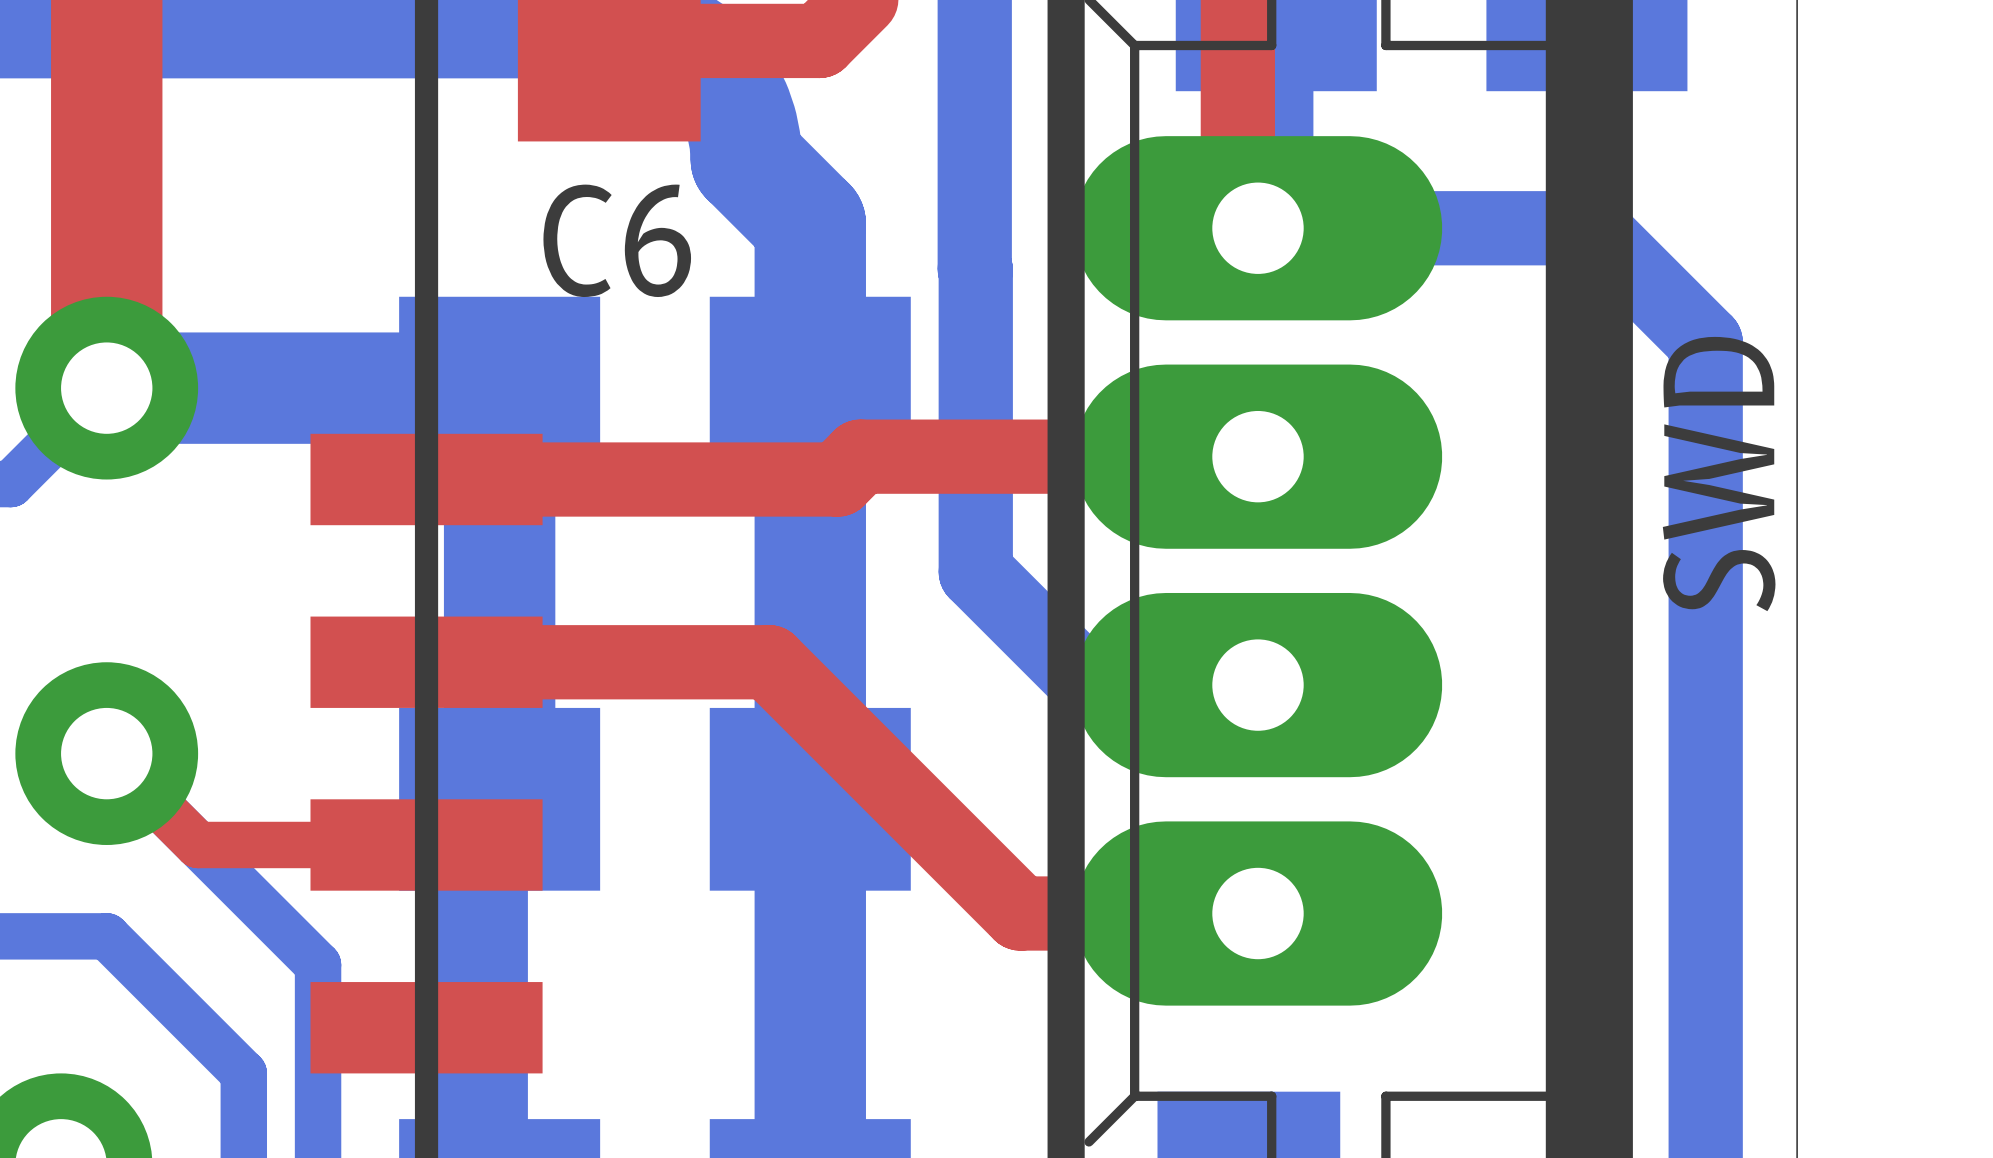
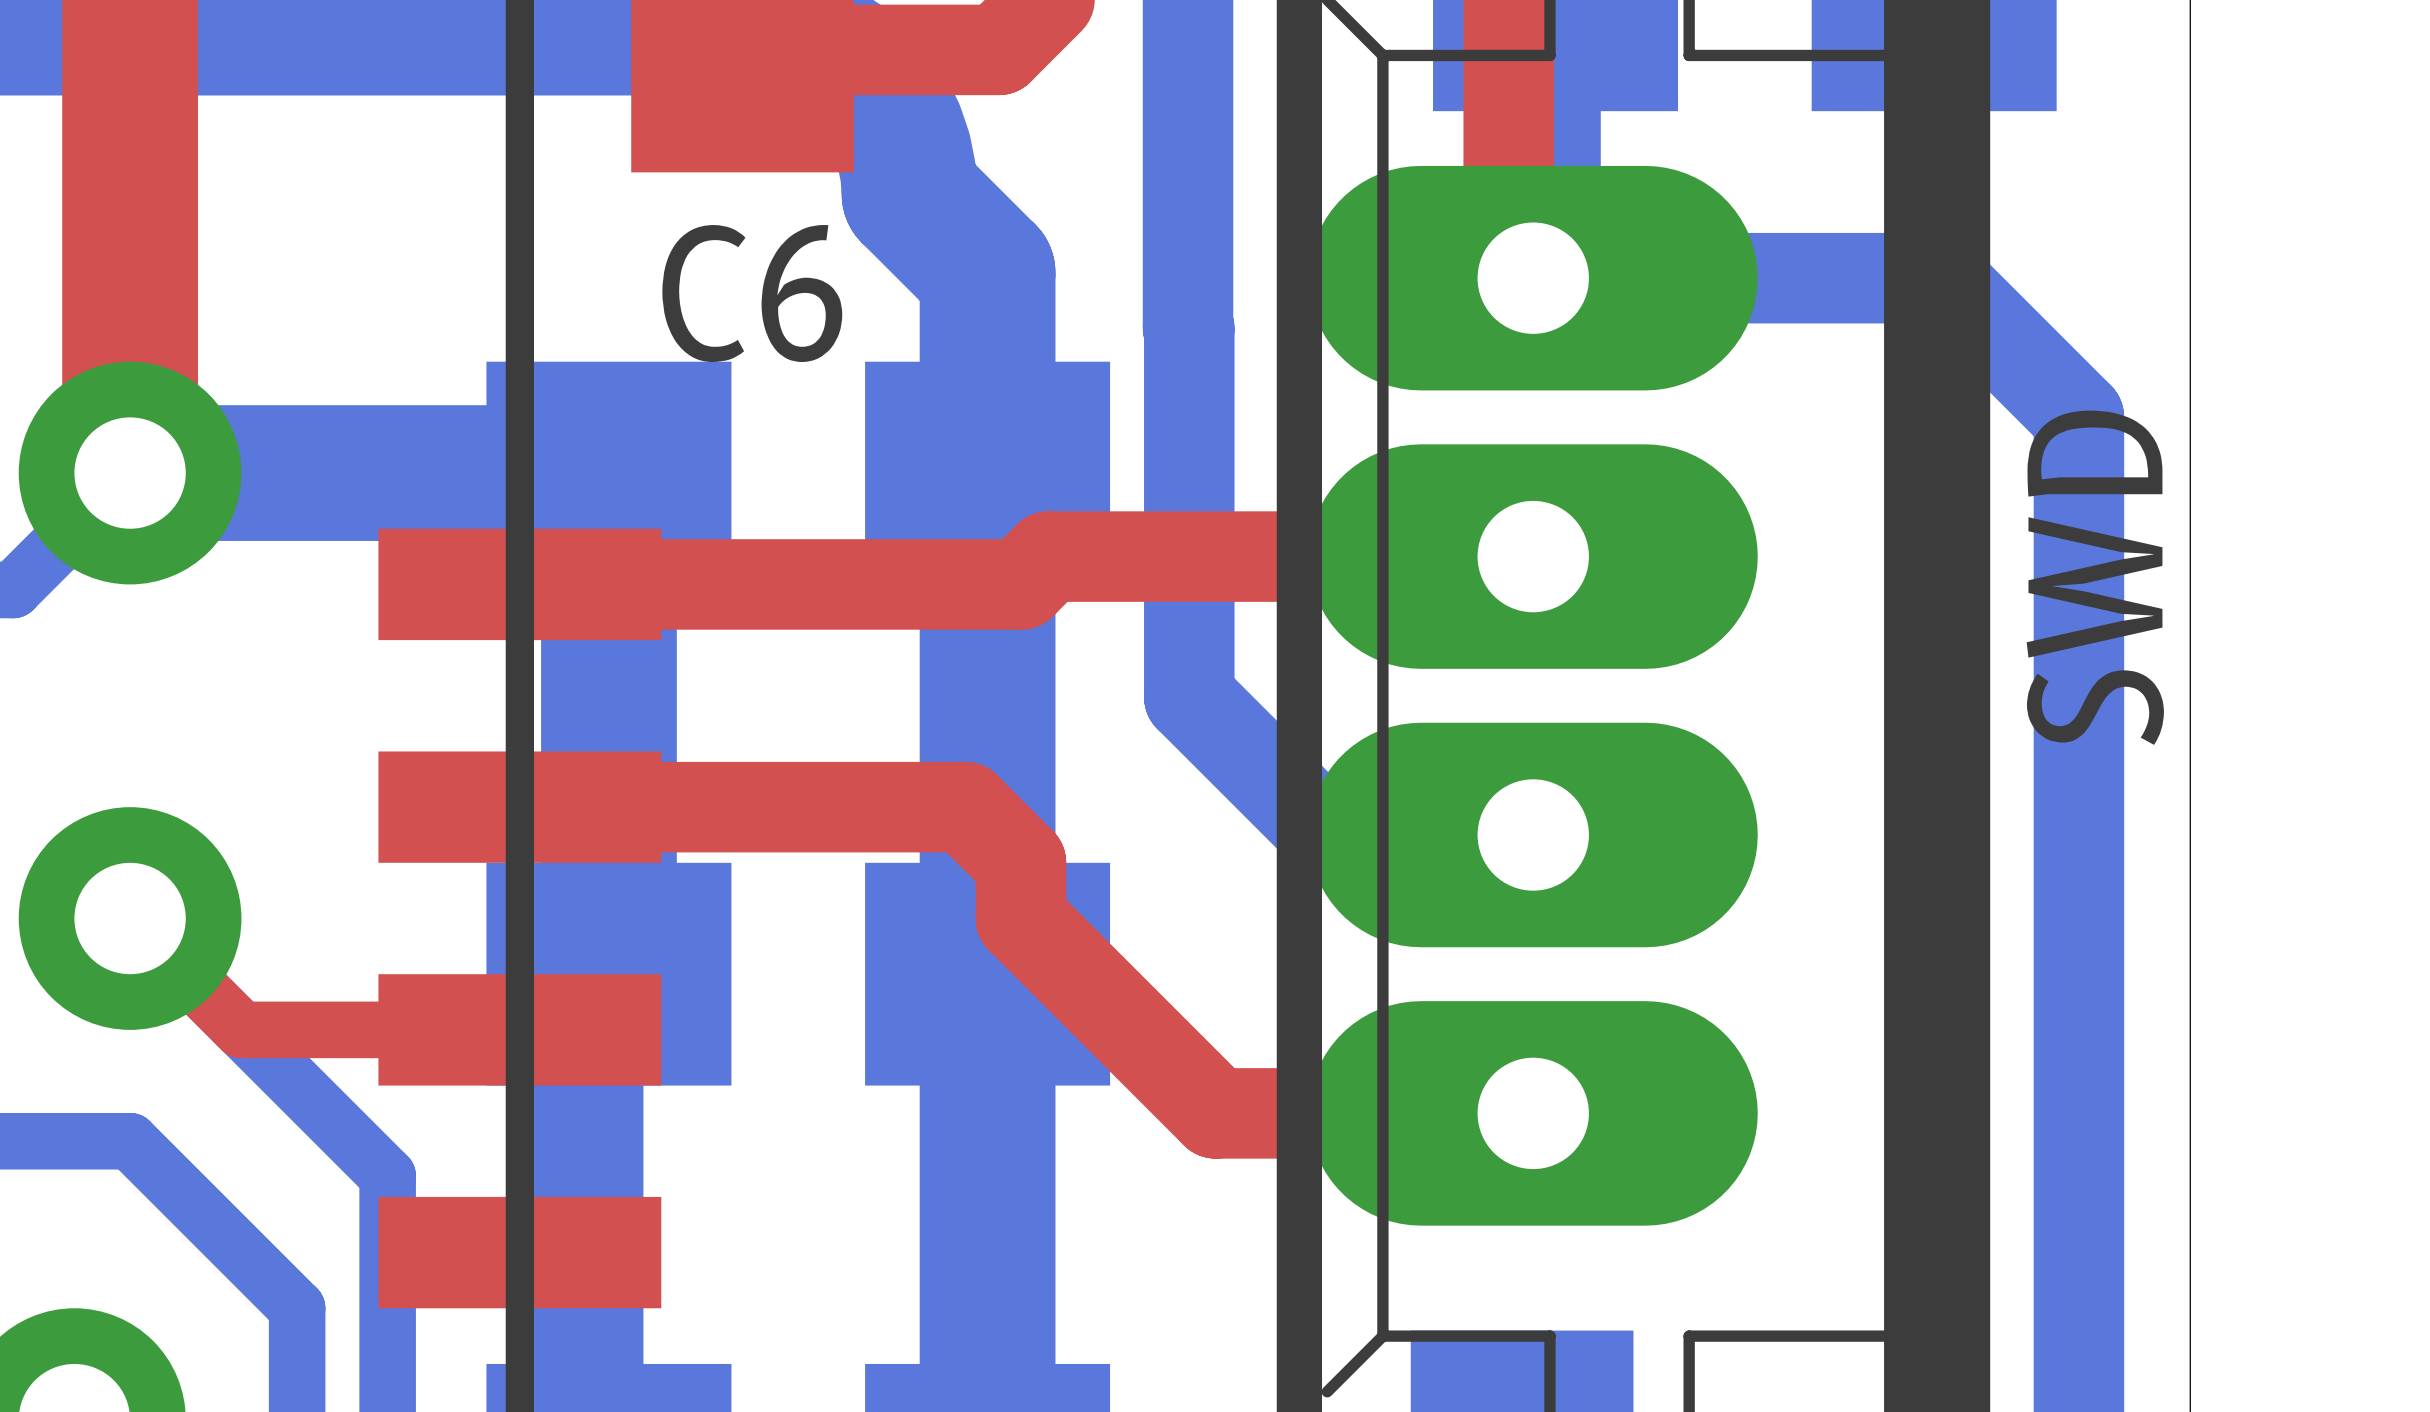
top track: (769, 662) (1020, 913) -> (937, 807) (965, 807) (1020, 862) (1020, 918) (1215, 1113) (1243, 1113)

